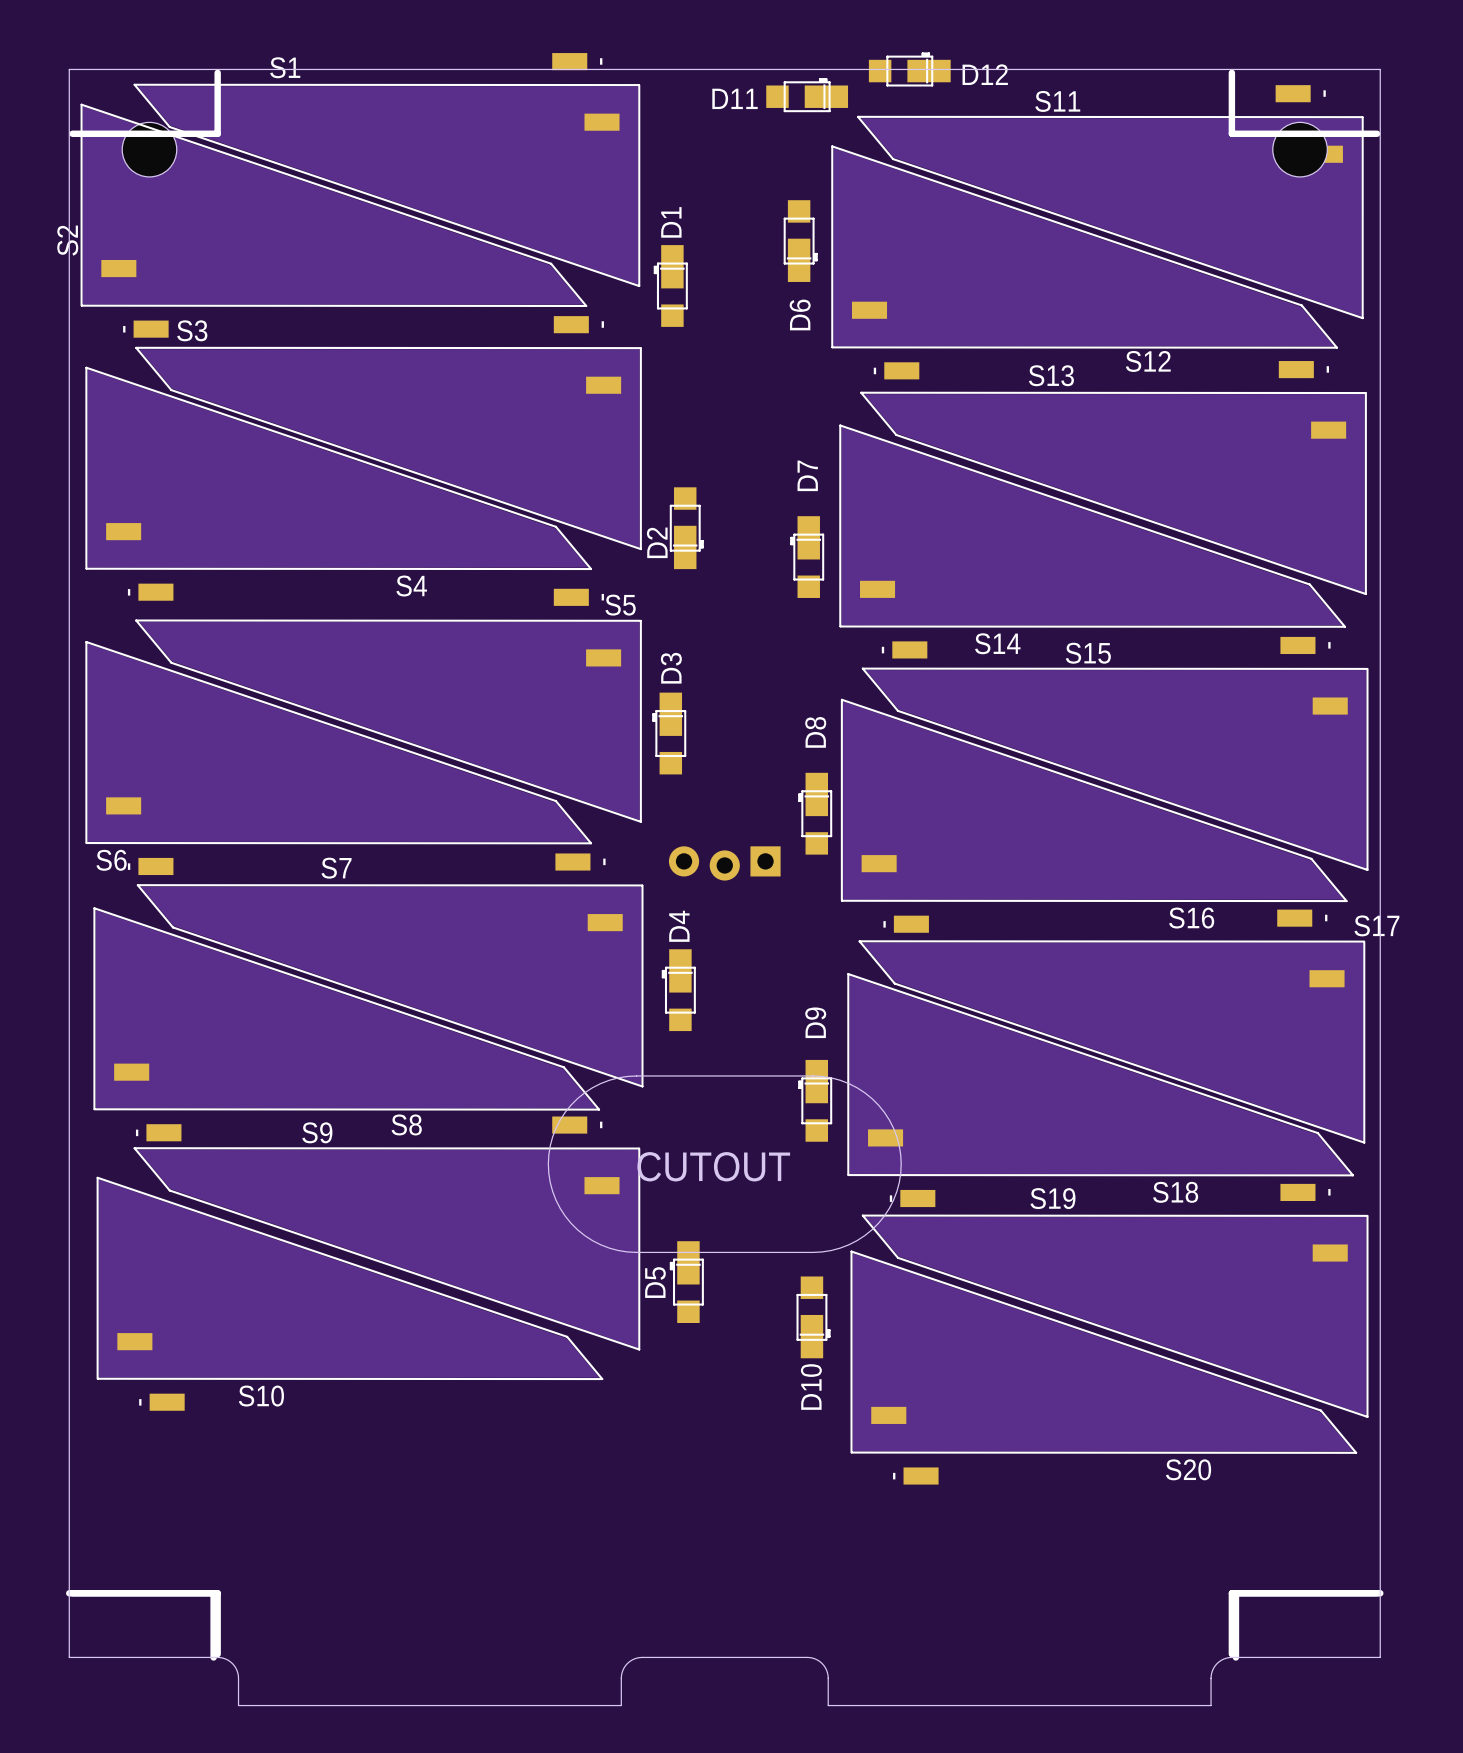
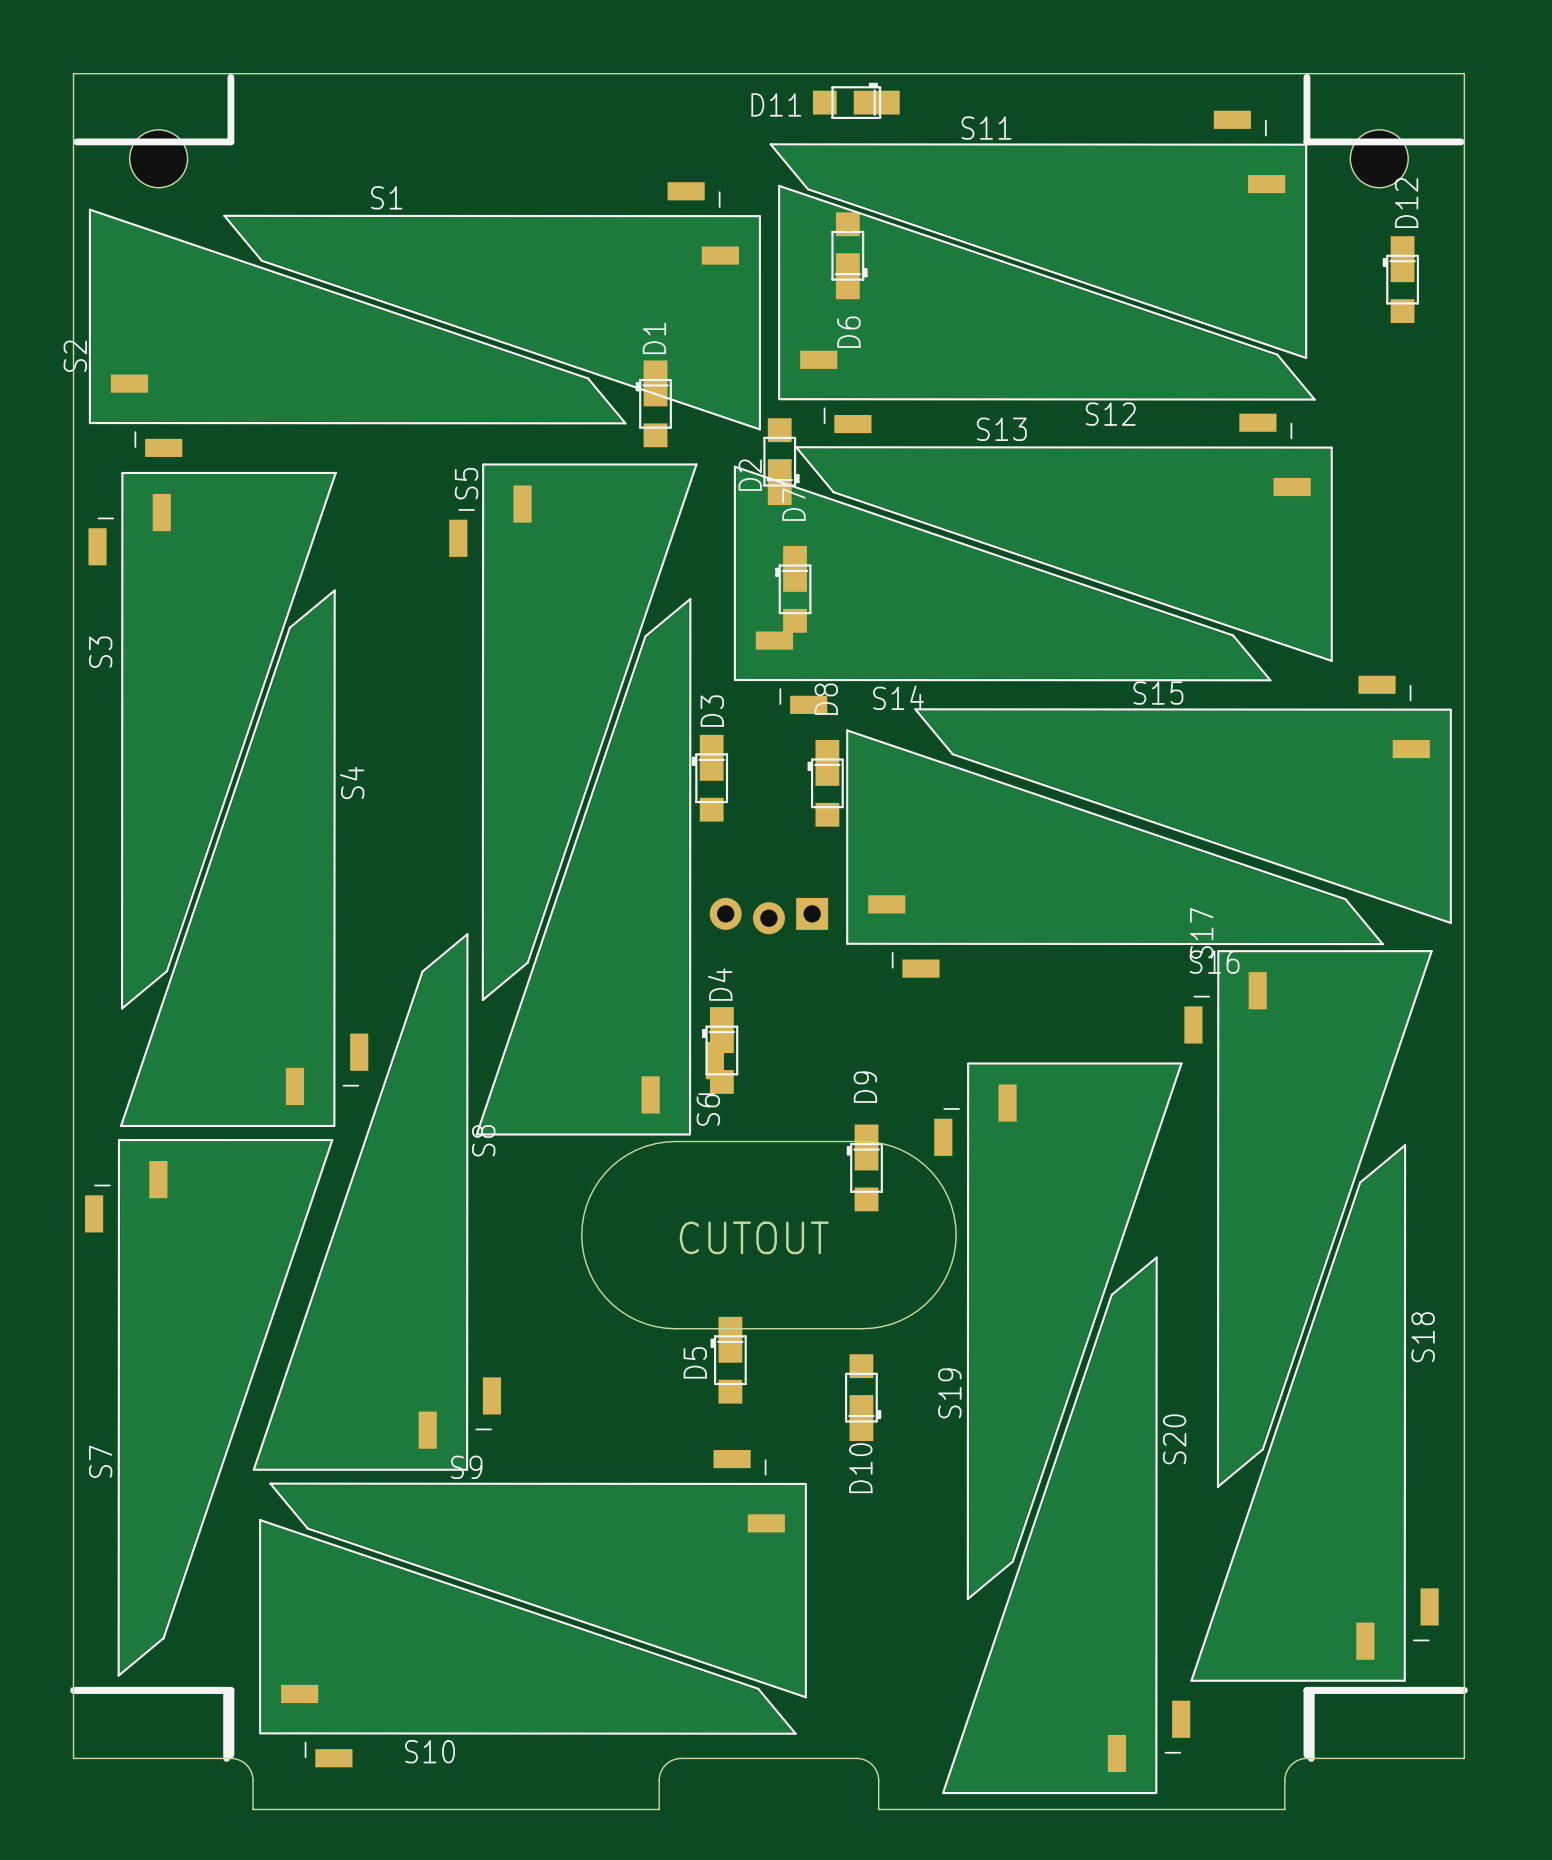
D12 rotation: 0° (909, 69) -> 90° counterclockwise (1400, 279)
D12 position: (909, 69) -> (1400, 279)
S1 position: (386, 170) -> (492, 306)
S11 position: (1110, 202) -> (1038, 234)
S2 position: (333, 220) -> (357, 332)
S12 position: (1084, 262) -> (1046, 309)
D1 position: (670, 285) -> (653, 403)
S3 footprint: [135, 316, 642, 551] -> [88, 471, 337, 1010]
S3 name position: S3 (192, 330) -> S3 (100, 652)
S4 footprint: [85, 366, 593, 601] -> [120, 589, 369, 1128]
S13 position: (1113, 478) -> (1063, 537)
D2 position: (686, 528) -> (781, 461)
S14 position: (1092, 541) -> (1002, 589)
D7 position: (807, 557) -> (793, 589)
S4 name position: S4 (411, 586) -> S4 (352, 782)
S5 footprint: [135, 588, 642, 823] -> [449, 463, 698, 1002]
S5 name position: S5 (620, 605) -> S5 (466, 483)
S6 footprint: [85, 641, 593, 876] -> [475, 597, 724, 1136]
D8 position: (815, 813) -> (825, 783)
S16 position: (1094, 815) -> (1114, 853)
S7 footprint: [136, 853, 644, 1088] -> [85, 1139, 334, 1677]
S6 name position: S6 (111, 860) -> S6 (708, 1110)
S7 name position: S7 (336, 868) -> S7 (100, 1461)
S8 footprint: [93, 907, 601, 1142] -> [252, 933, 502, 1471]
S17 footprint: [858, 909, 1366, 1144] -> [1184, 950, 1433, 1488]
S17 name position: S17 (1376, 925) -> S17 (1201, 933)
S18 footprint: [847, 973, 1354, 1208] -> [1190, 1144, 1439, 1682]
S8 name position: S8 (406, 1124) -> S8 (483, 1140)
S19 footprint: [861, 1183, 1369, 1418] -> [934, 1062, 1183, 1601]
S18 name position: S18 (1175, 1192) -> S18 (1423, 1337)
S19 name position: S19 (1052, 1198) -> S19 (949, 1393)
S9 position: (386, 1233) -> (538, 1574)
S20 footprint: [850, 1250, 1358, 1485] -> [941, 1256, 1191, 1795]
S10 position: (349, 1293) -> (527, 1643)
S20 name position: S20 (1188, 1469) -> S20 (1174, 1439)

